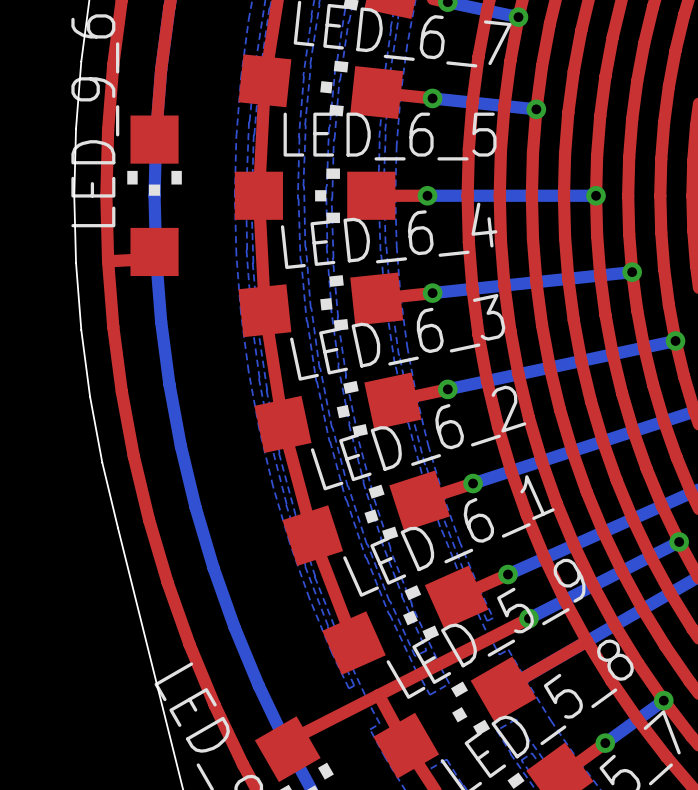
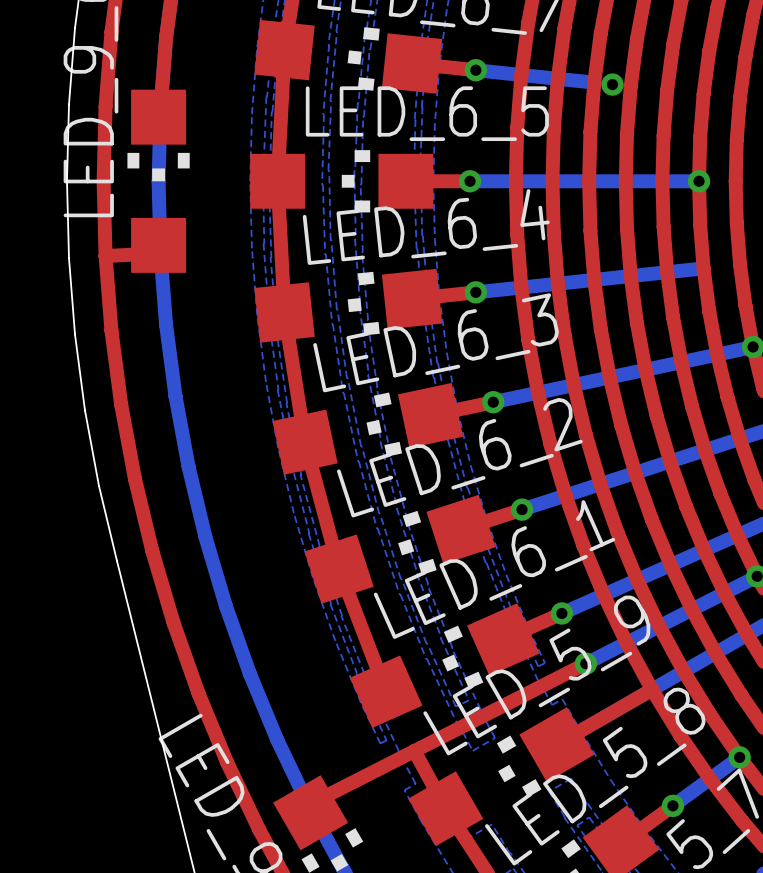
via position: (536, 109) -> (612, 84)
bottom track: none -> (662, 181) (699, 181)
via position: (596, 195) -> (699, 181)
via: (632, 272) -> none

